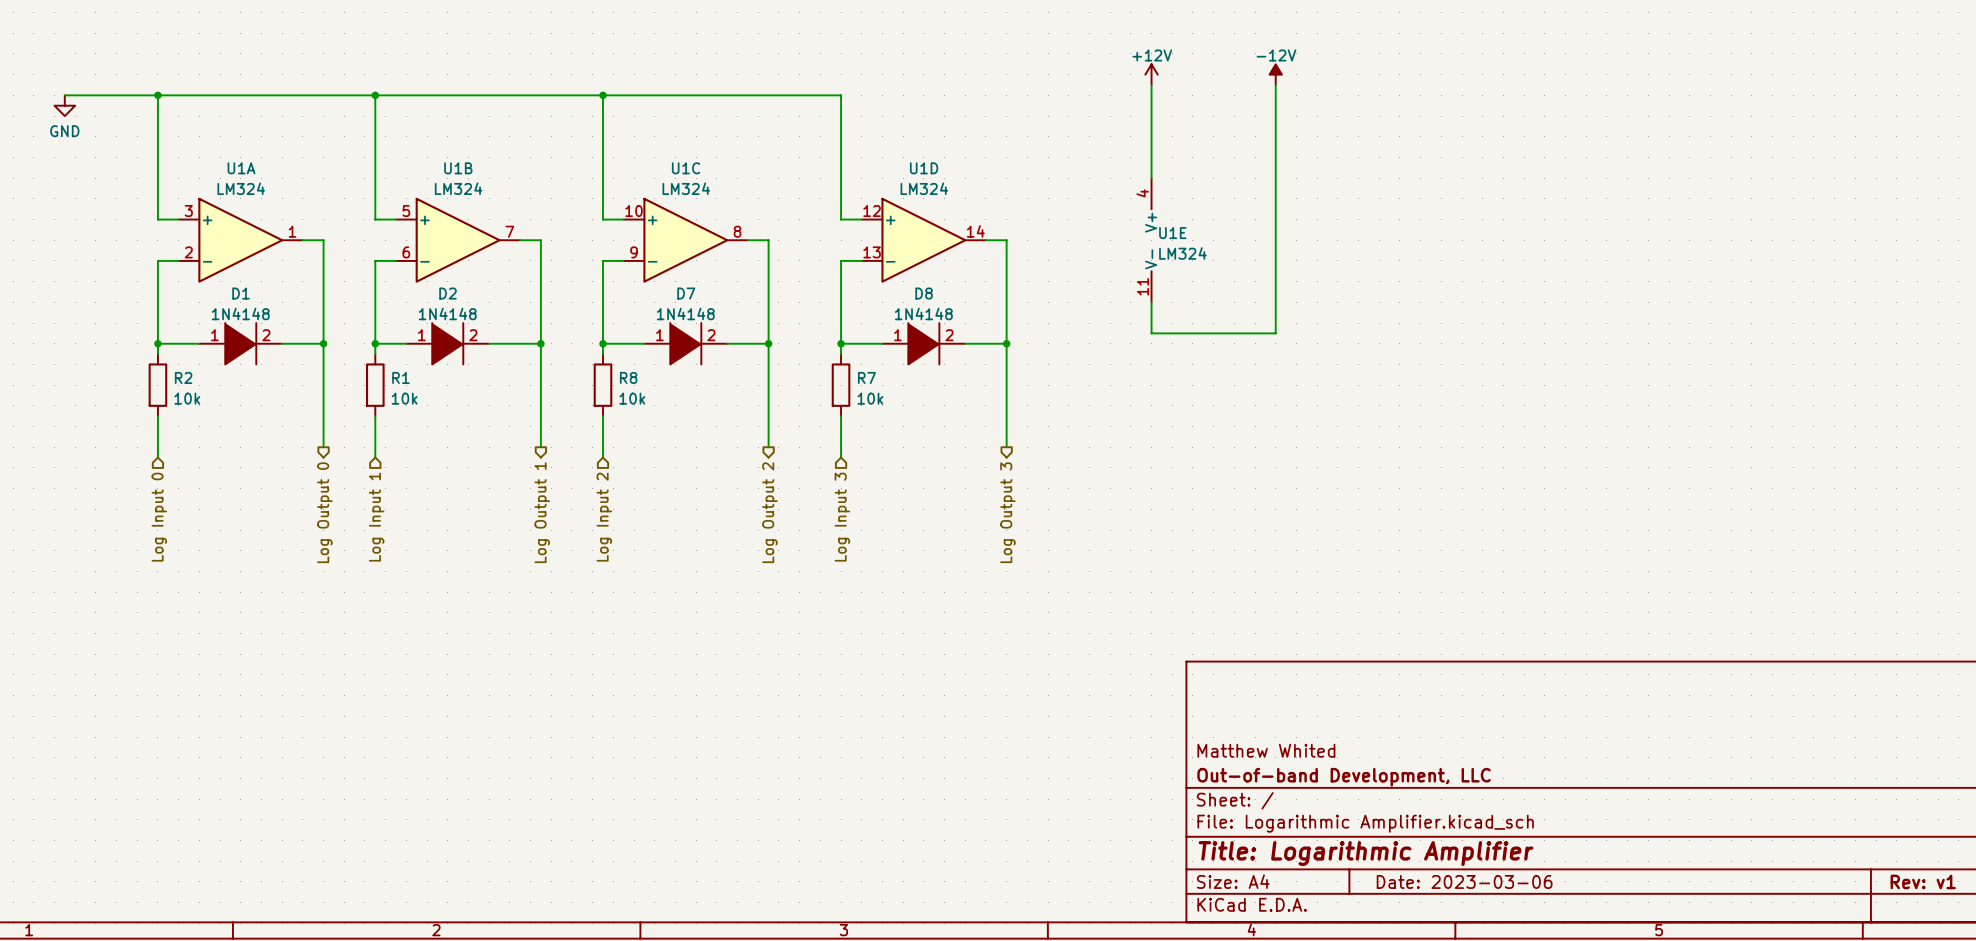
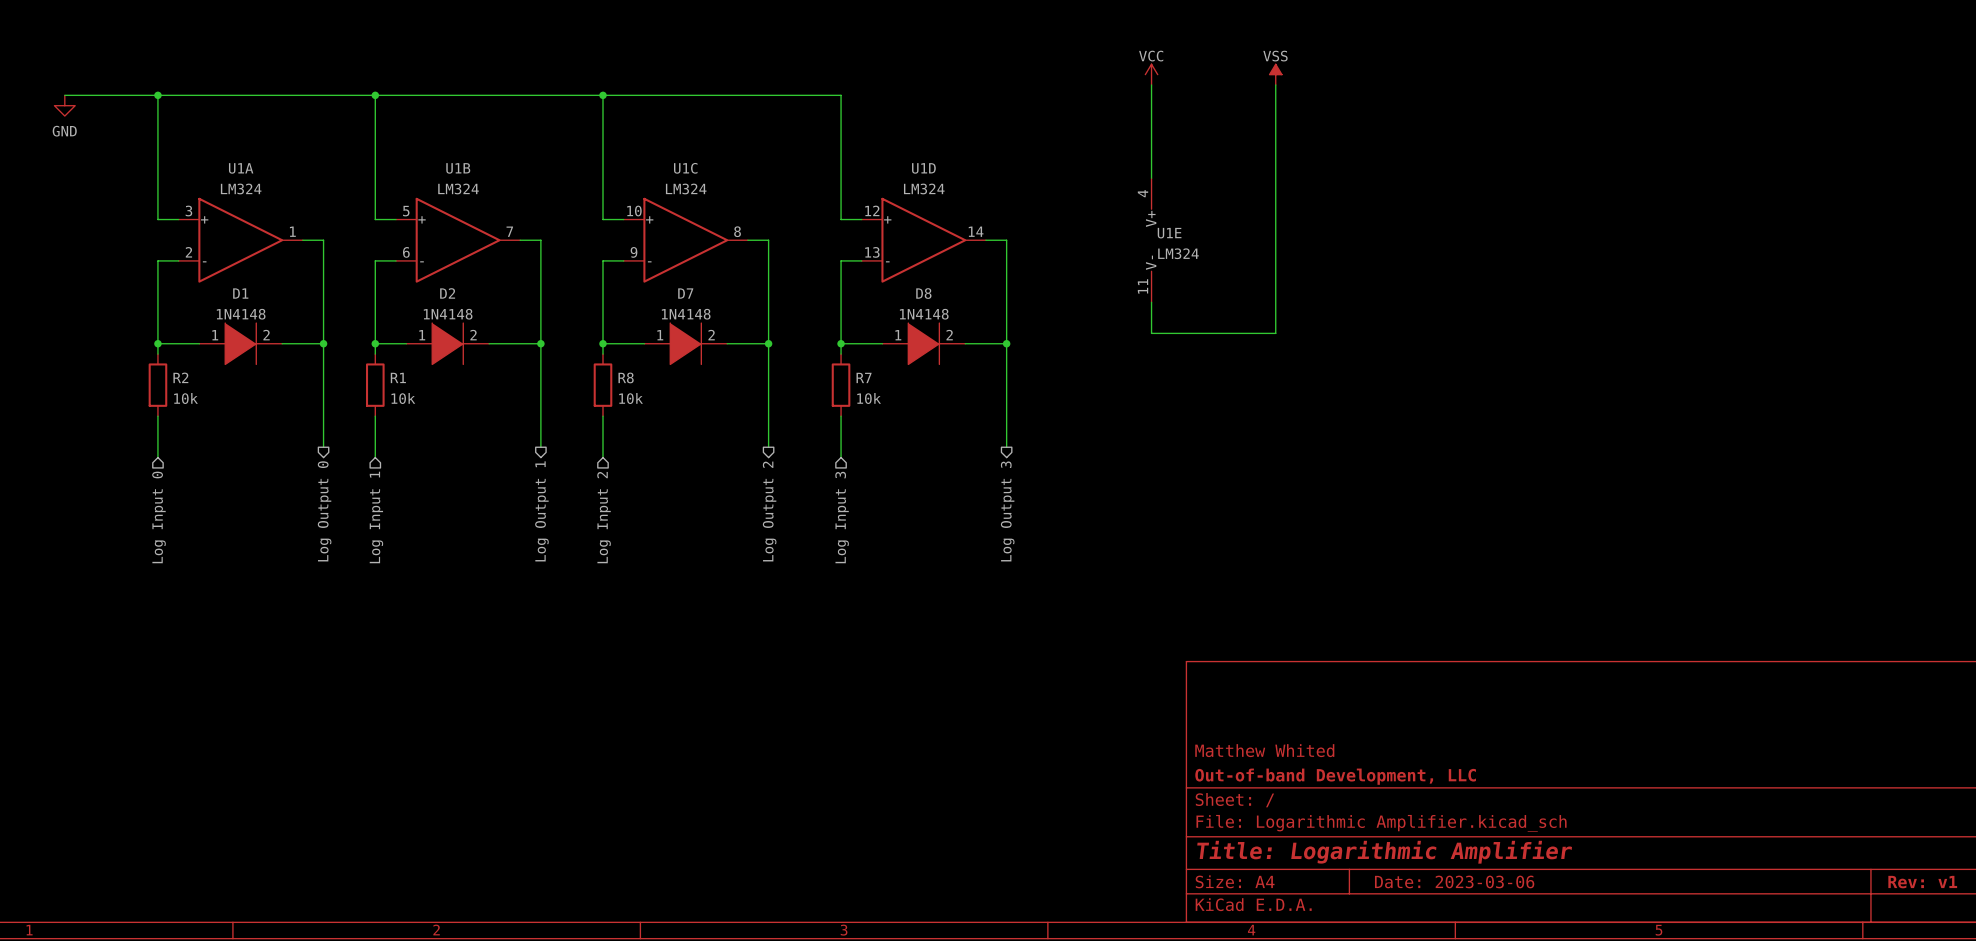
power symbol: +12V (1151, 74) -> VCC (1151, 74)
power symbol: -12V (1275, 74) -> VSS (1275, 74)

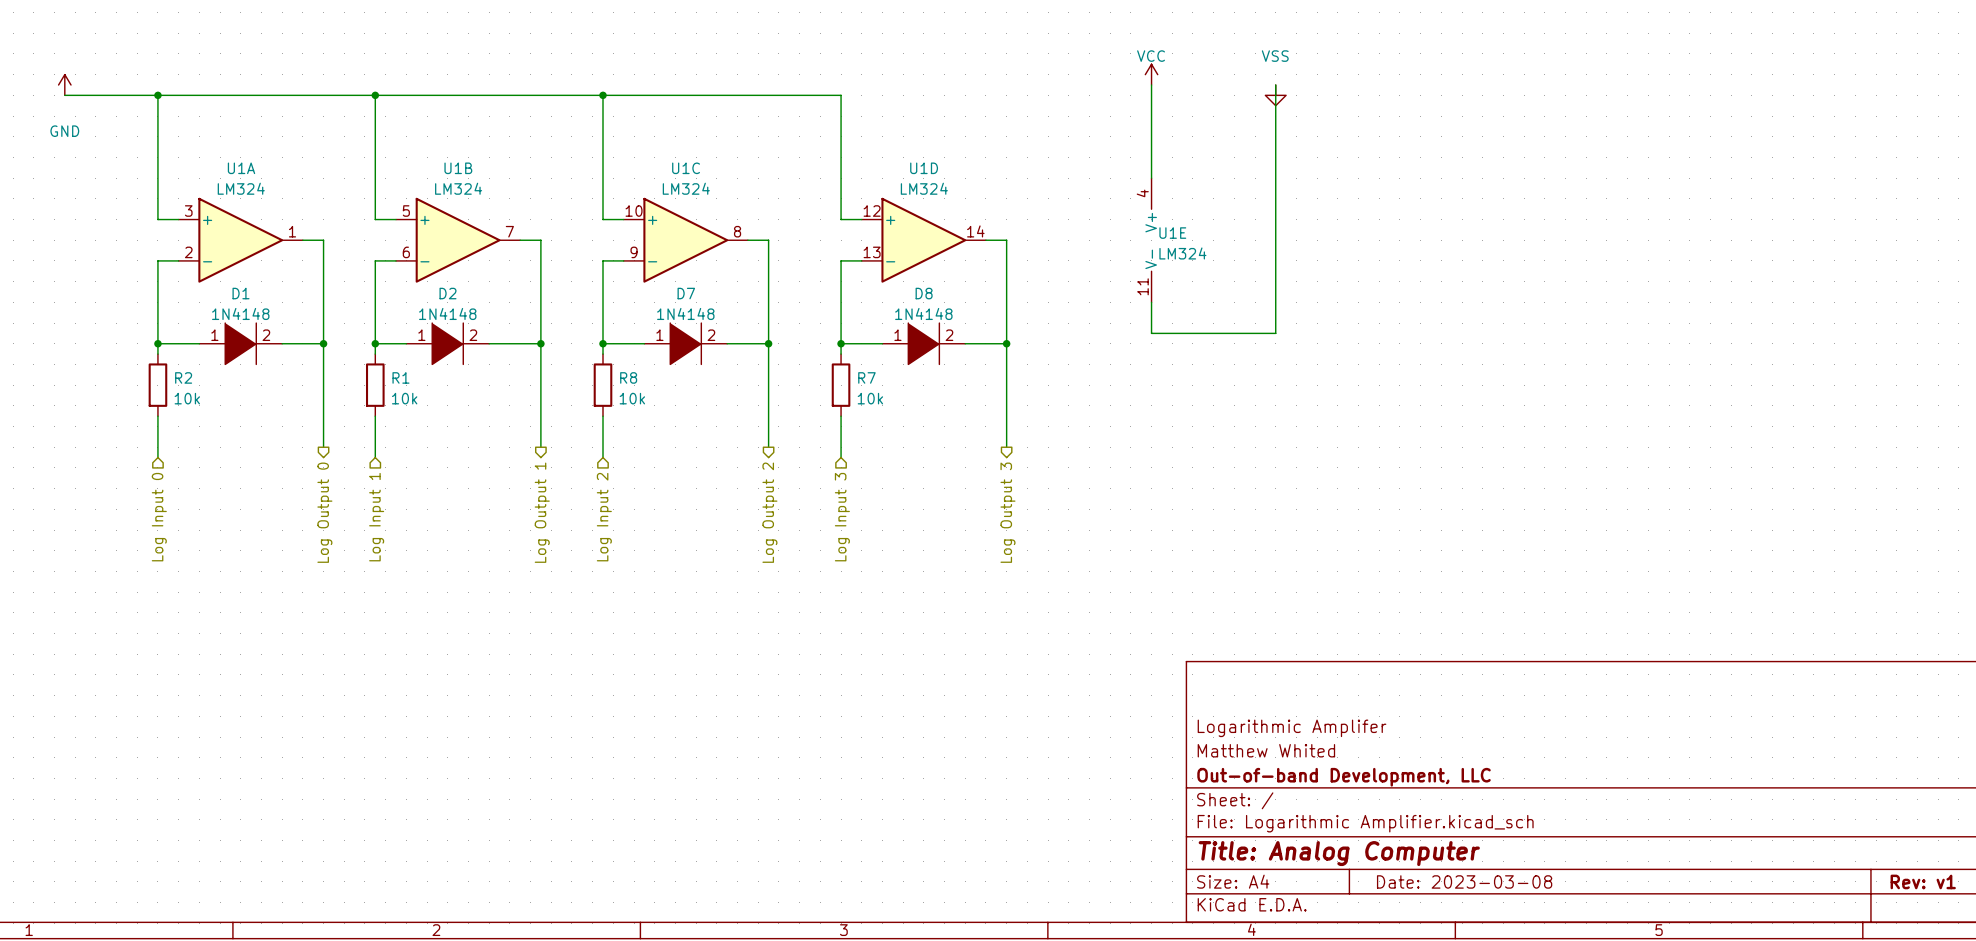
power symbol: VSS (1275, 74) -> none
power symbol: none -> GND (64, 84)
power symbol: none -> VSS (1275, 95)
power symbol: GND (64, 105) -> none
title block: none -> Logarithmic Amplifer (1292, 728)
title block: Title: Logarithmic Amplifier (1384, 852) -> Title: Analog Computer (1339, 853)
title block: Date: 2023-03-06 (1454, 881) -> Date: 2023-03-08 (1464, 881)

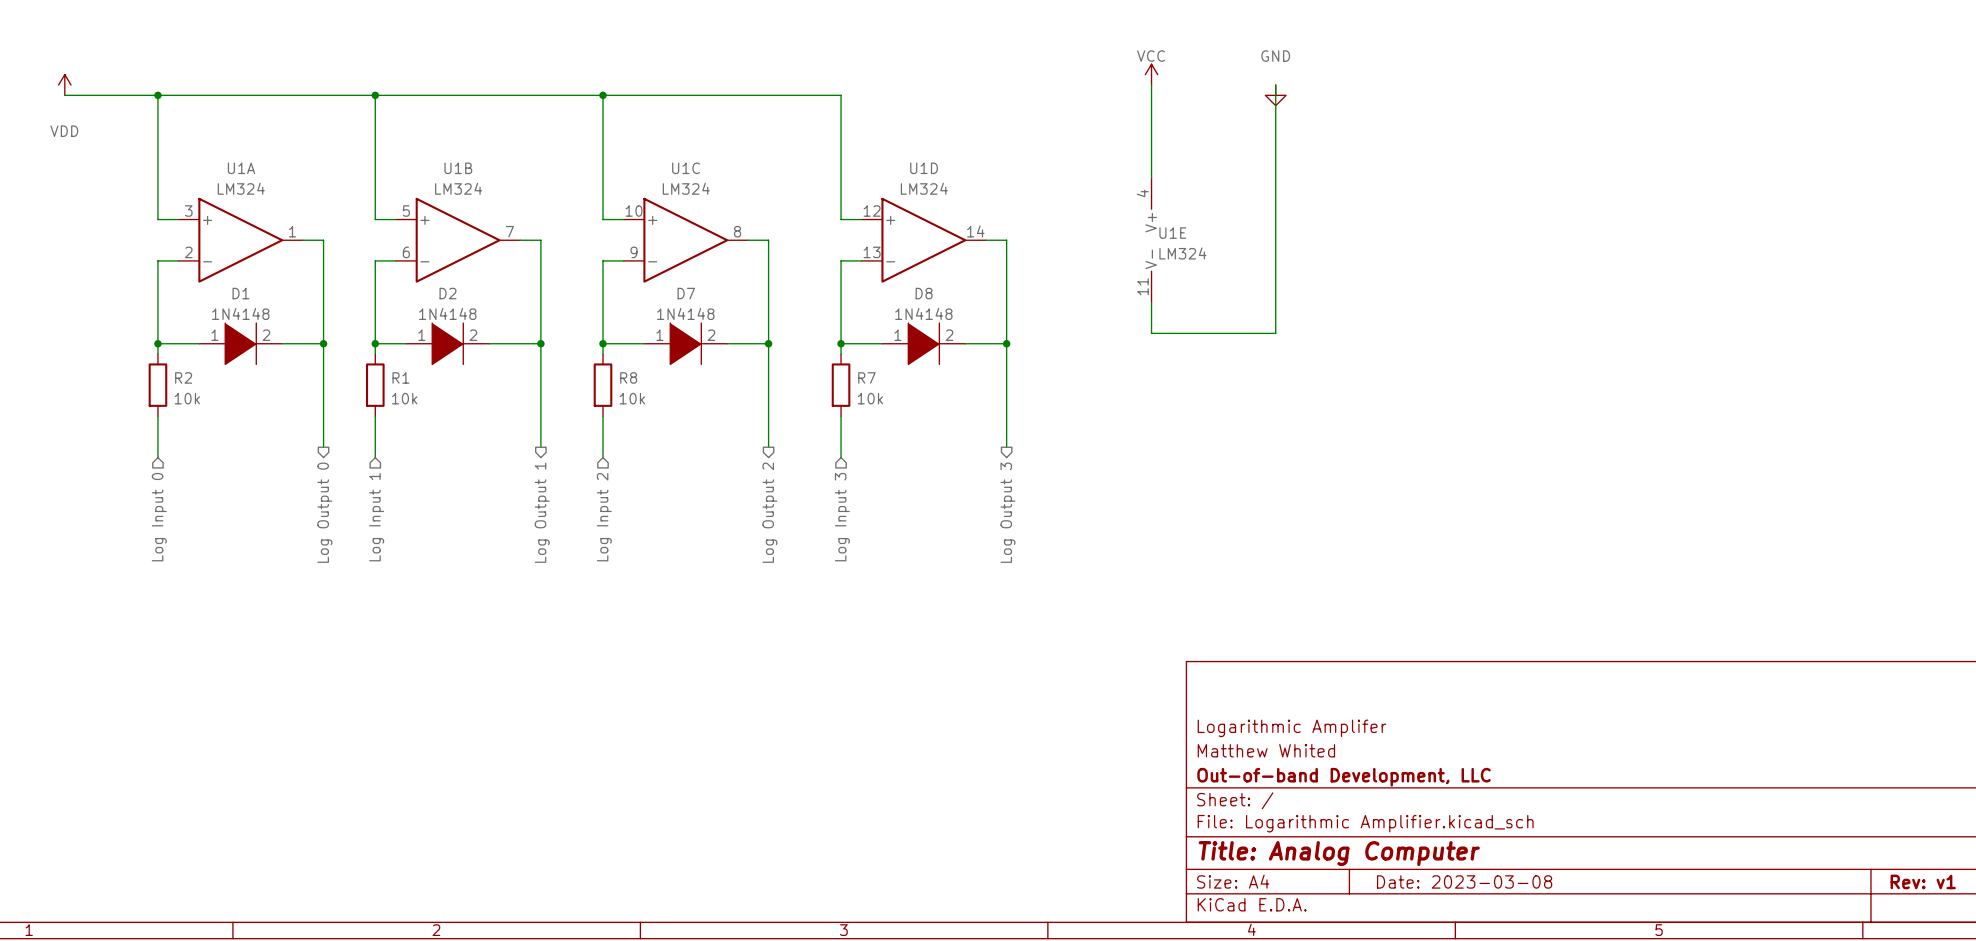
power symbol: GND (64, 84) -> VDD (64, 84)
power symbol: VSS (1275, 95) -> GND (1275, 95)

